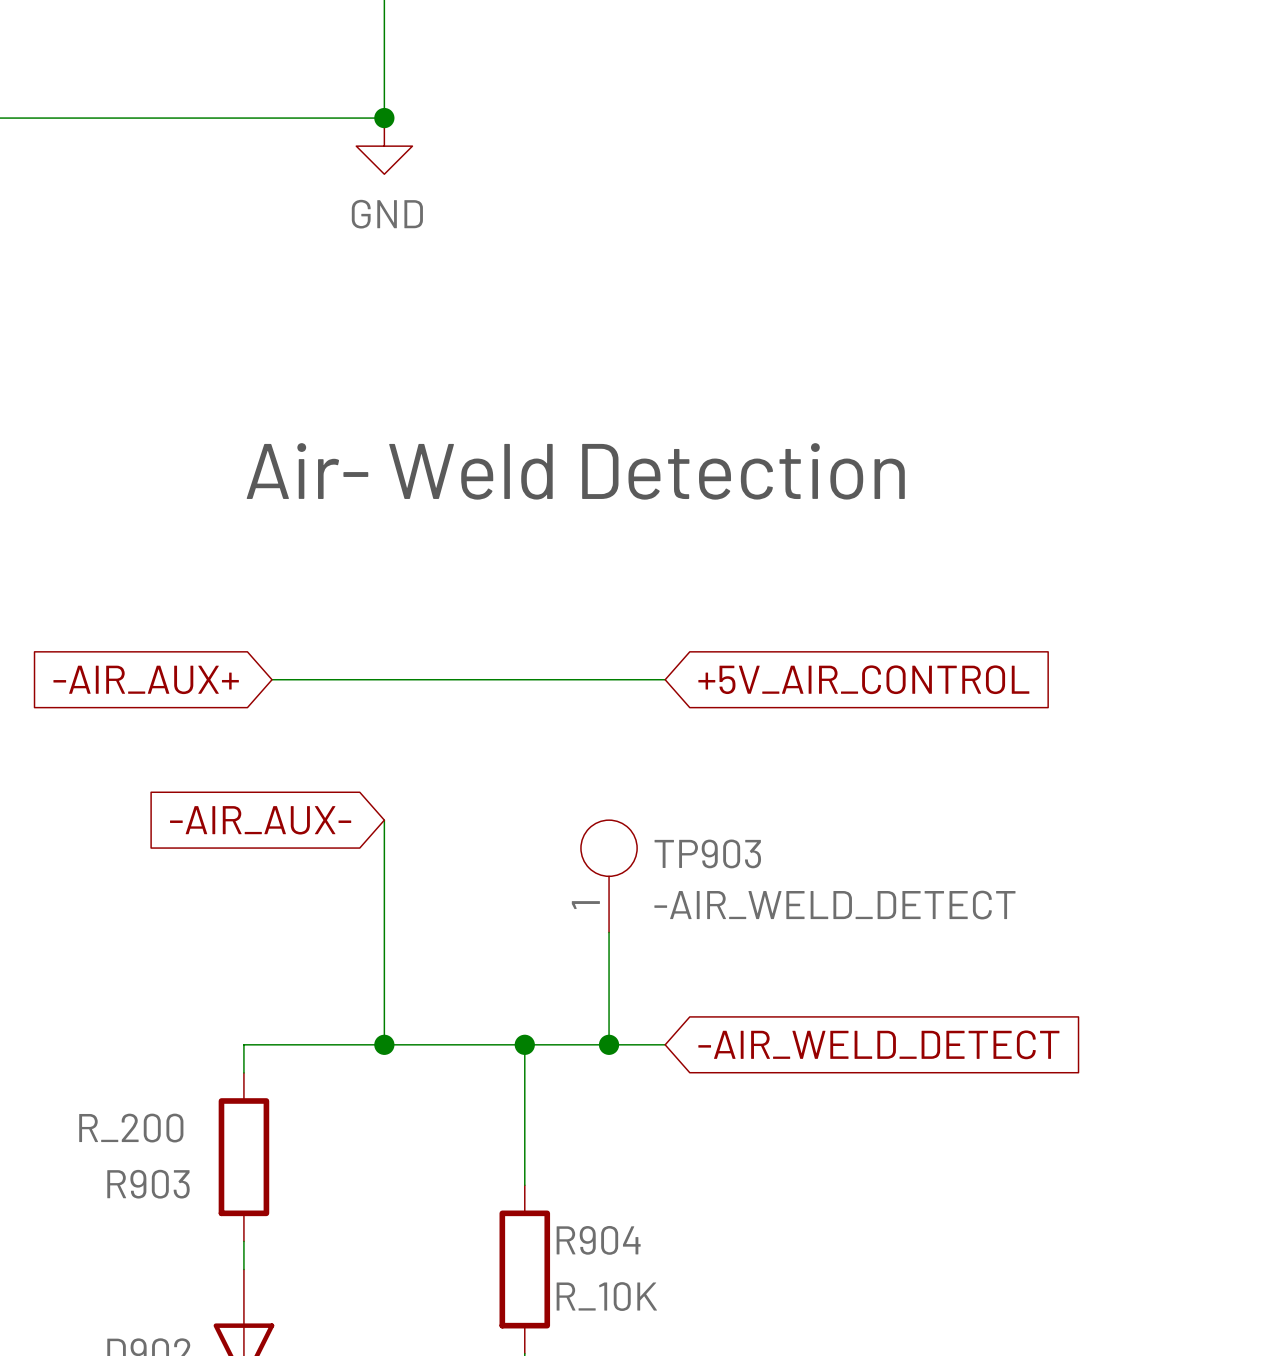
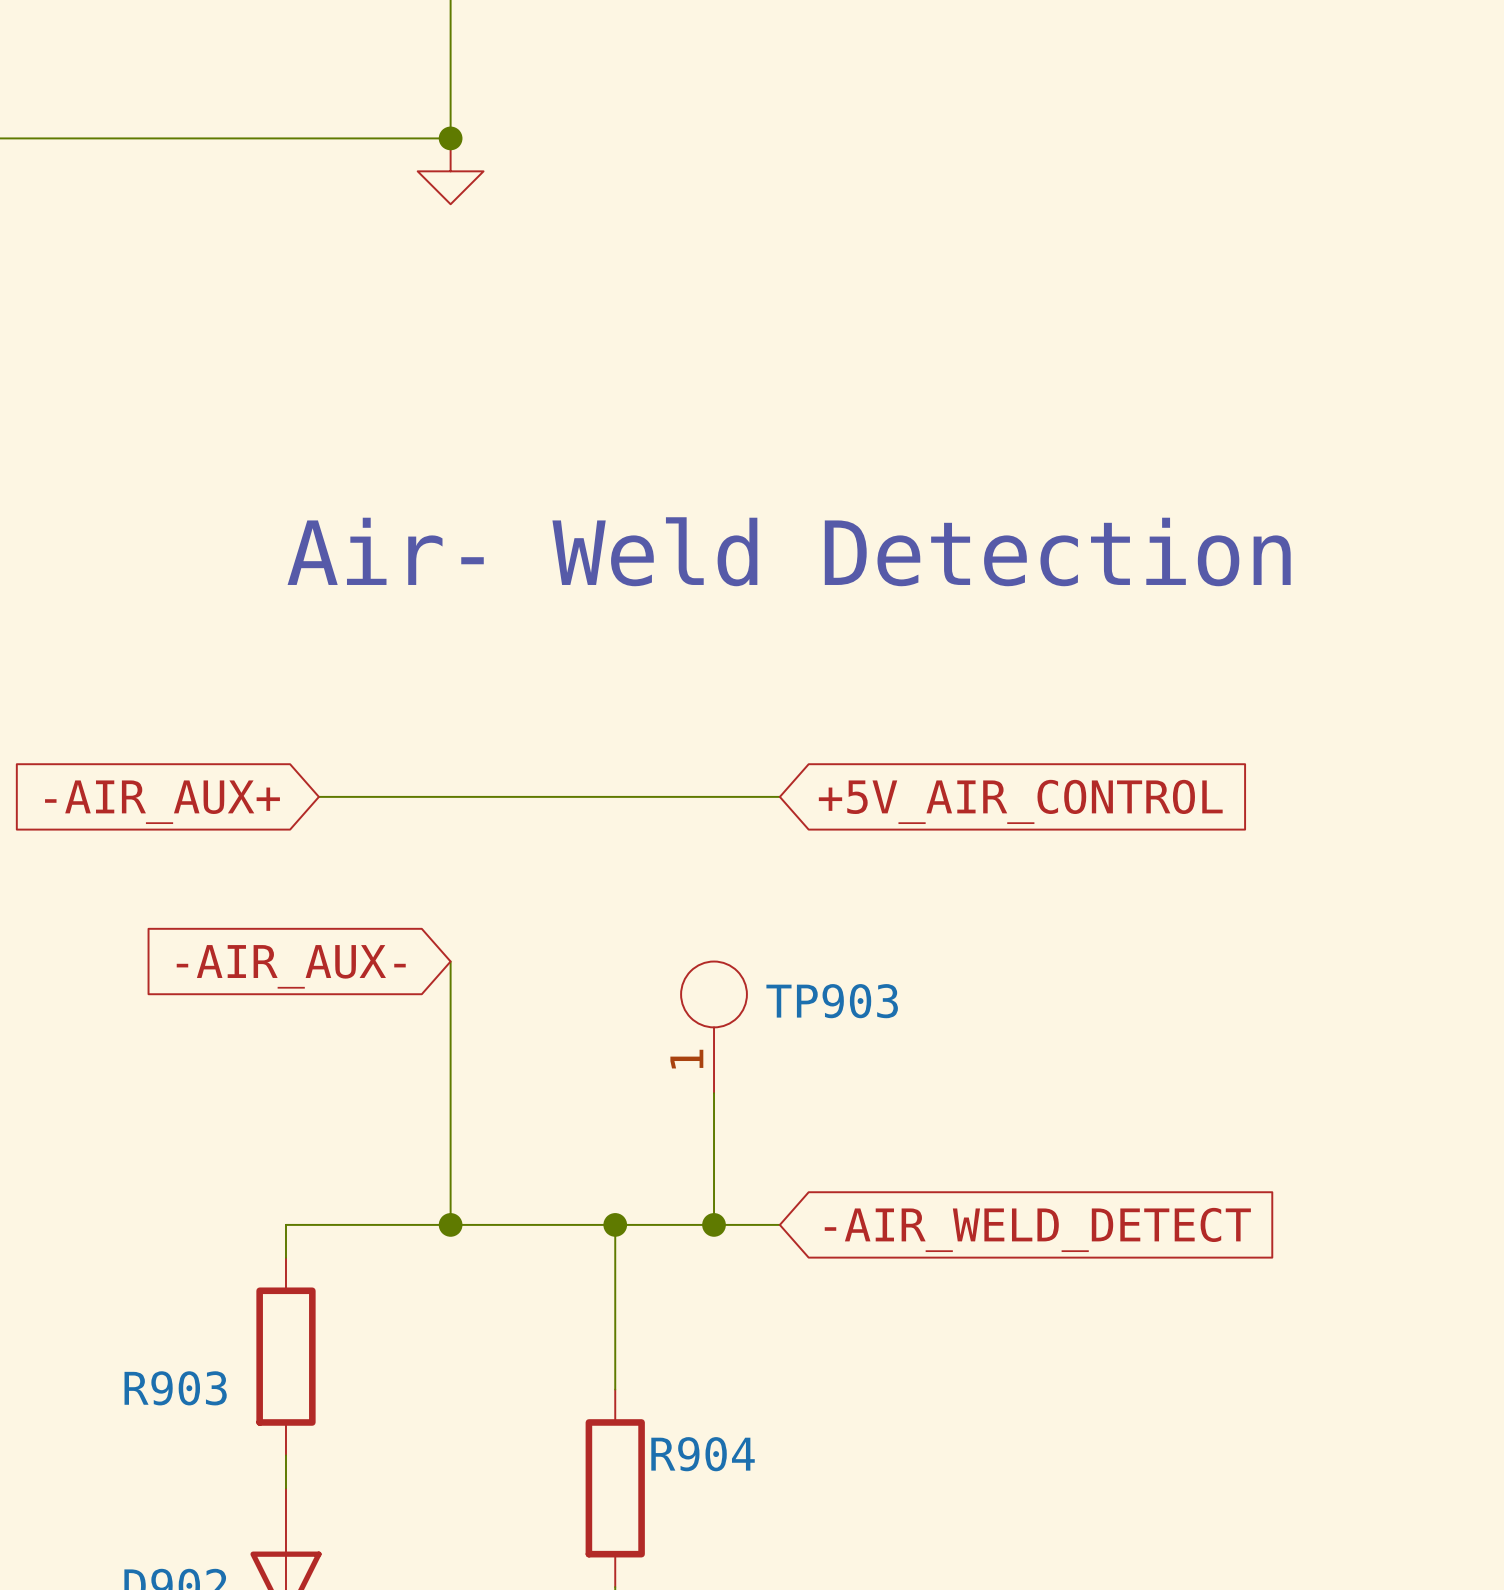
power symbol text: GND (387, 214) -> none
TP903 value: -AIR_WELD_DETECT (834, 905) -> none
R903 value: R_200 (131, 1128) -> none
R904 value: R_10K (606, 1296) -> none

